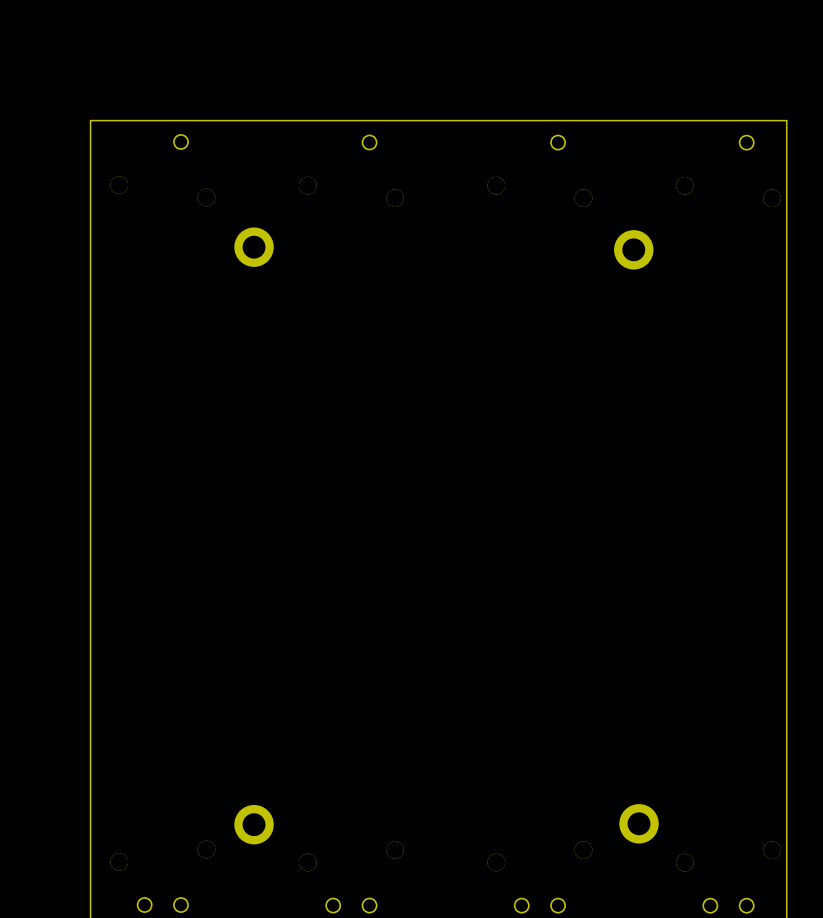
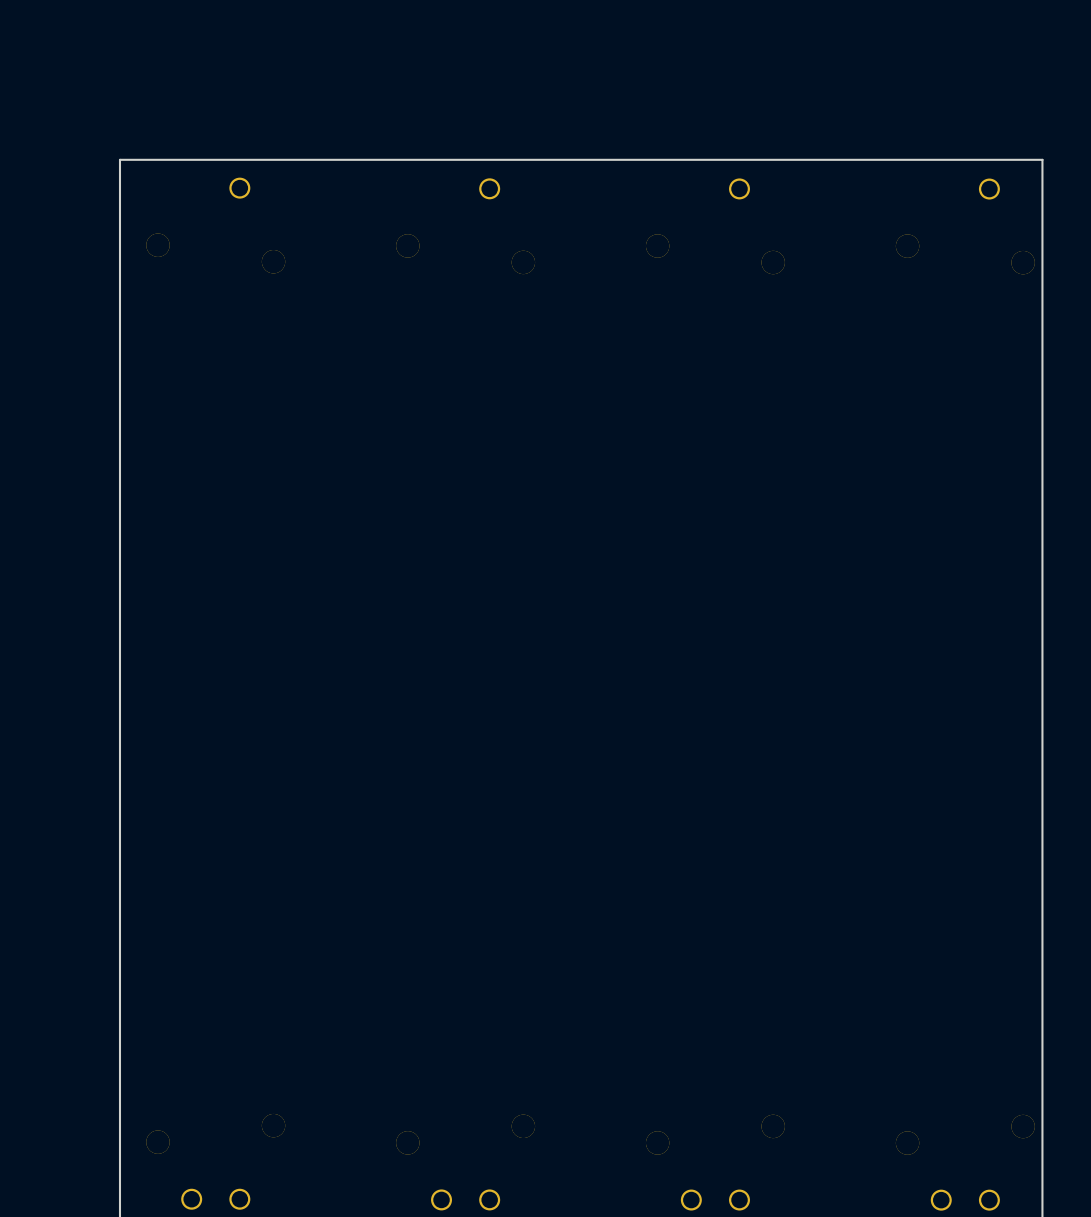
part: (254, 247) -> none
part: (633, 249) -> none
part: (639, 823) -> none
part: (254, 824) -> none

